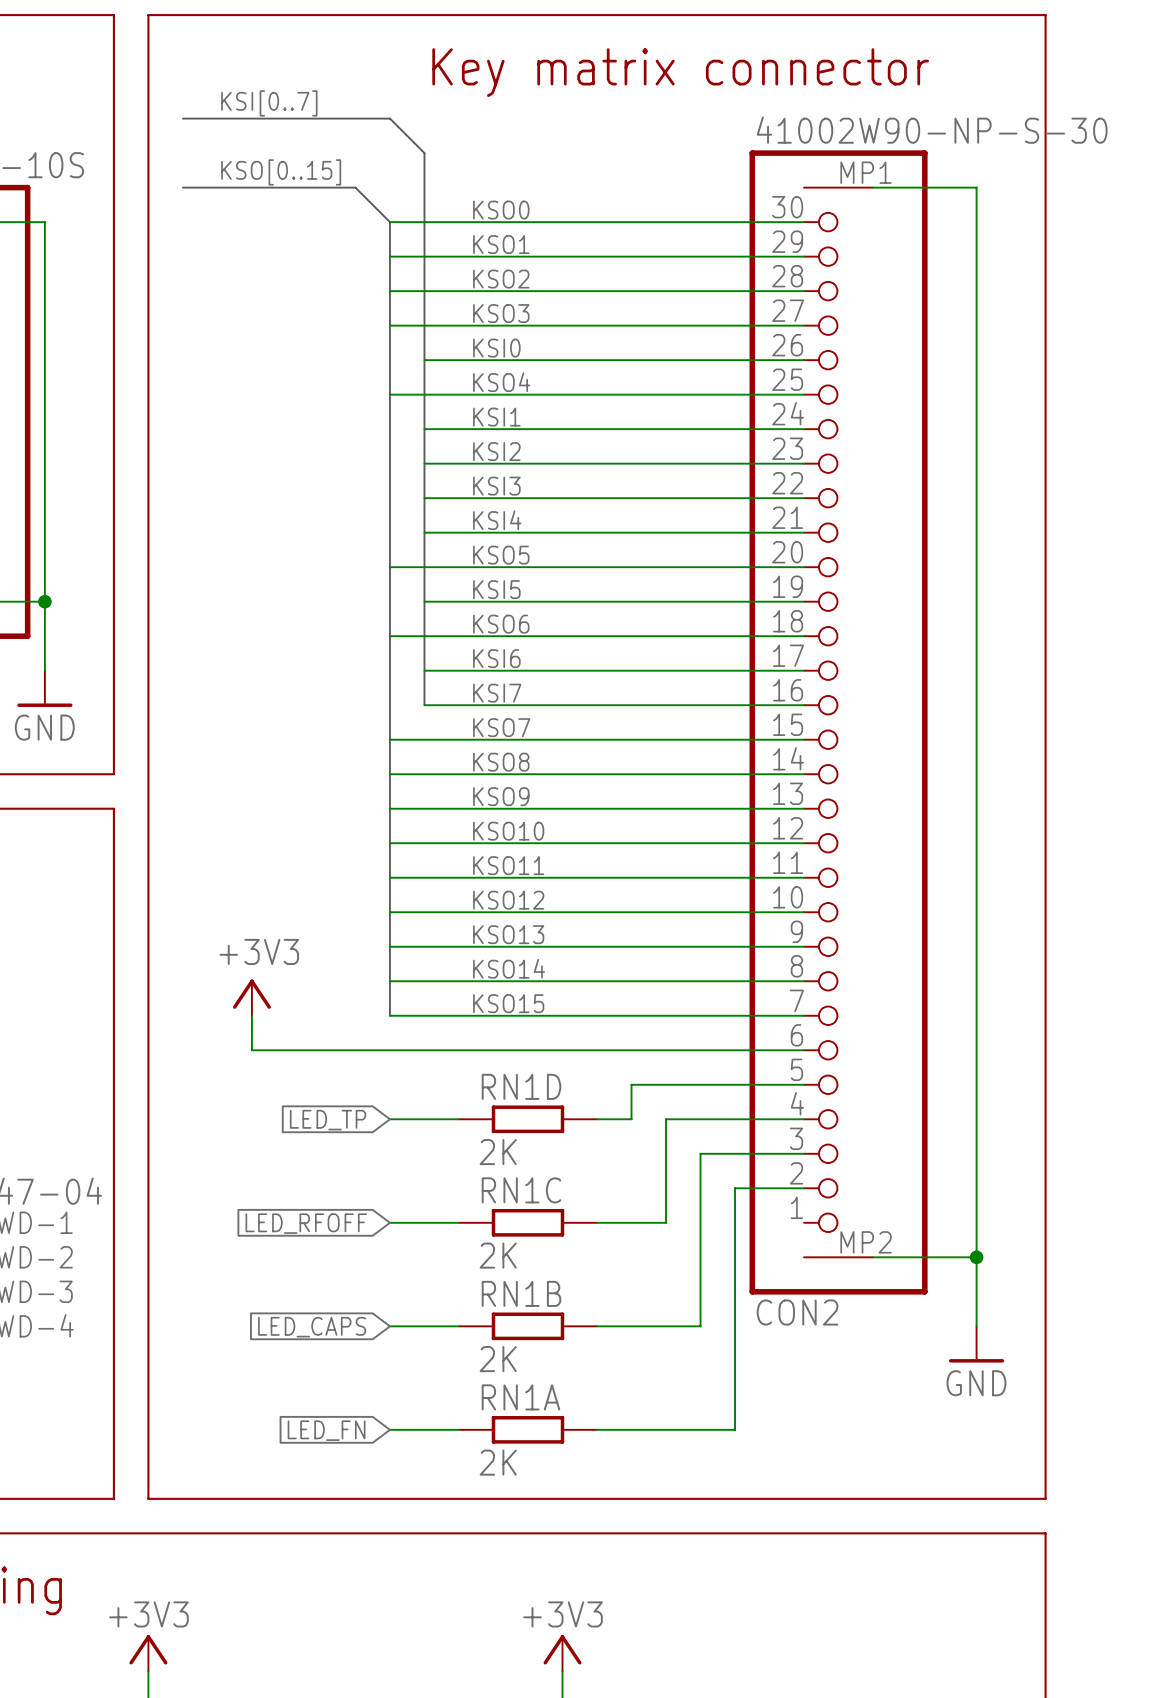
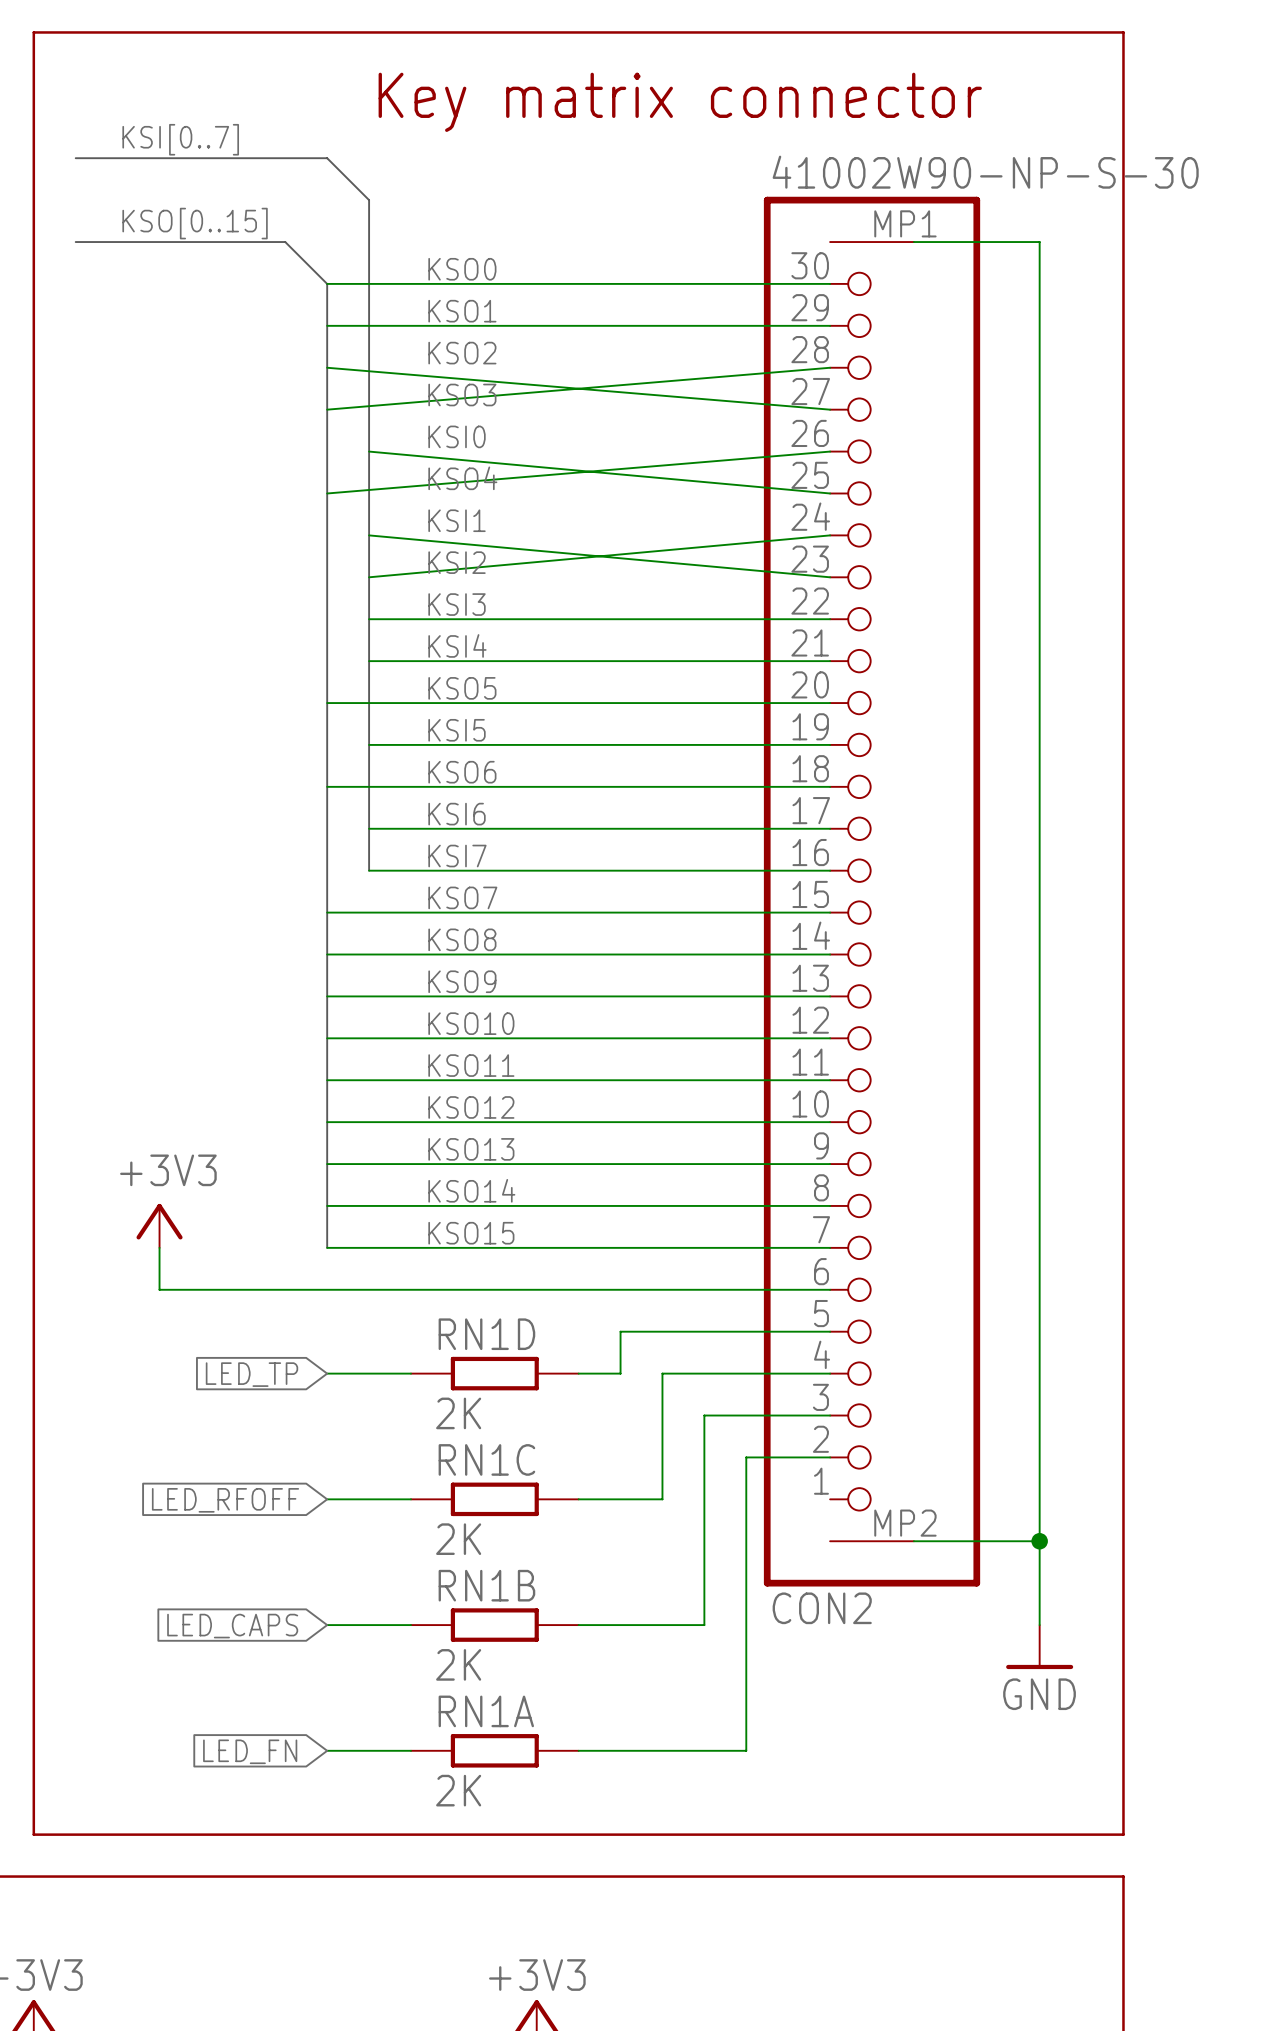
wire: (389, 291) (804, 291) -> (327, 367) (830, 409)
wire: (389, 325) (804, 325) -> (327, 409) (830, 367)
wire: (424, 360) (804, 360) -> (369, 451) (830, 493)
wire: (389, 394) (804, 394) -> (327, 493) (830, 451)
wire: (424, 429) (804, 429) -> (369, 535) (830, 577)
wire: (424, 463) (804, 463) -> (369, 577) (830, 535)

